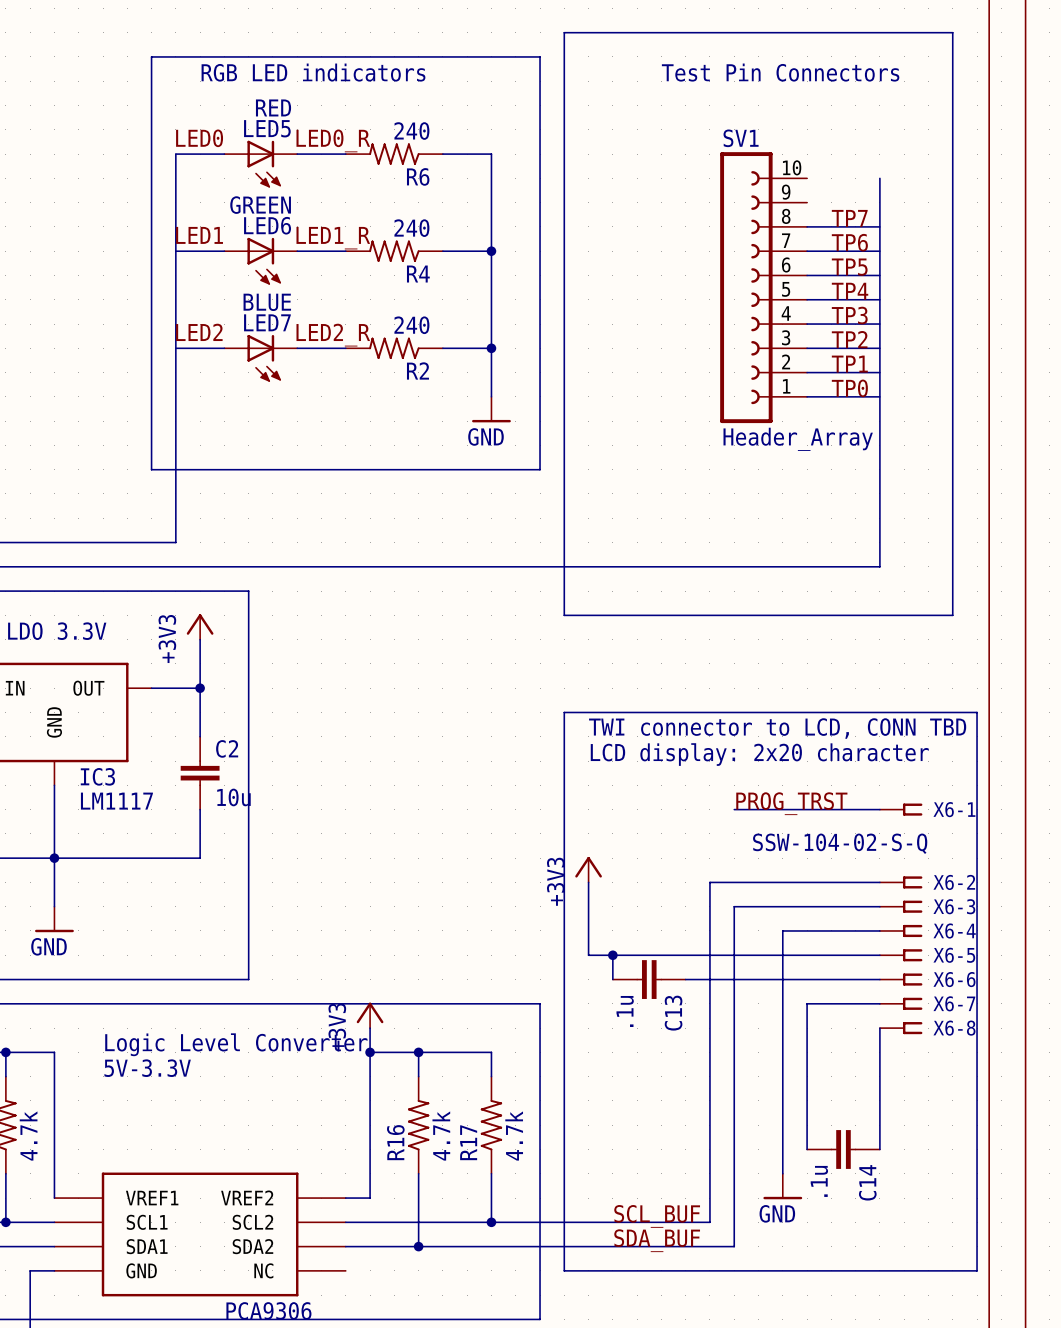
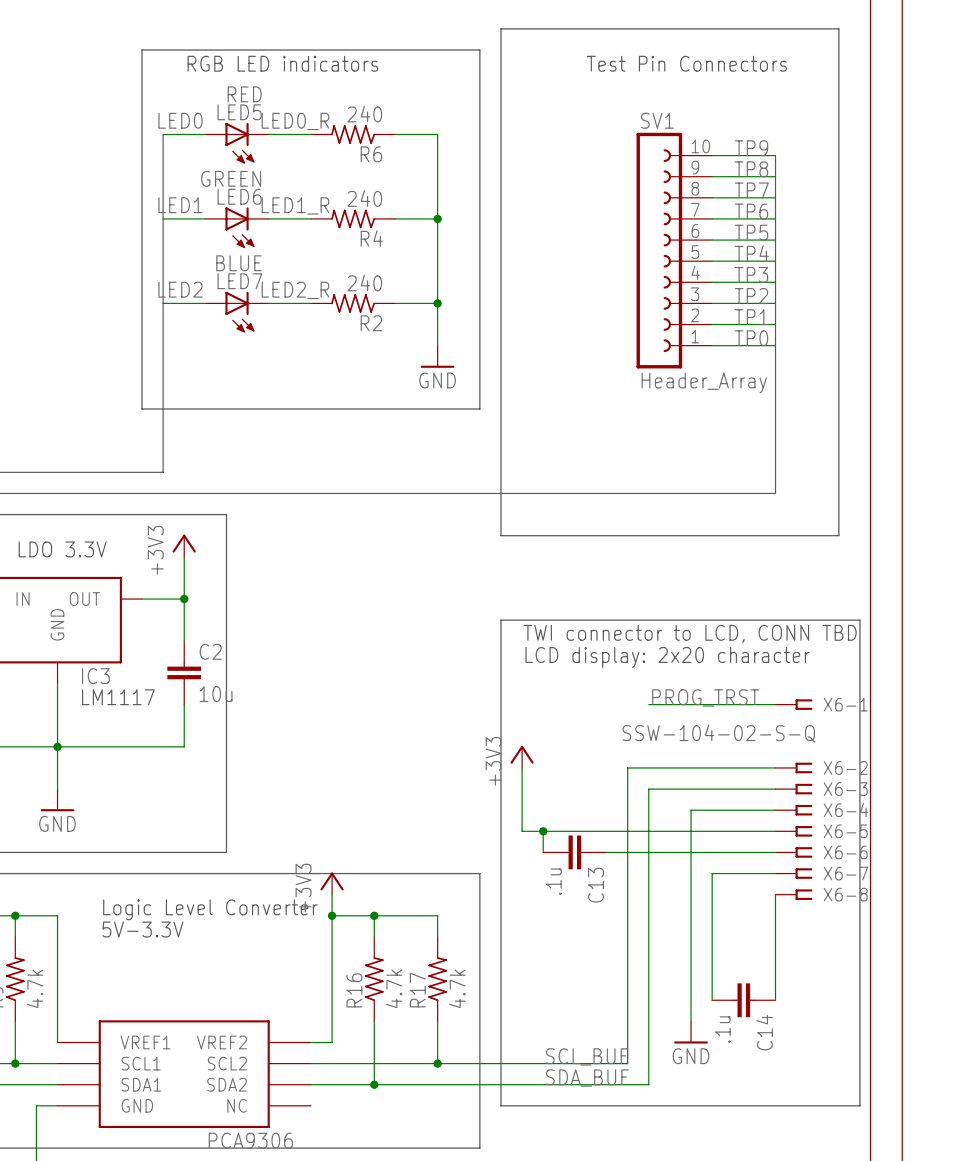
label: none -> TP9 (751, 148)
wire: none -> (712, 155) (775, 155)
label: none -> TP8 (751, 169)
wire: none -> (712, 176) (775, 176)

